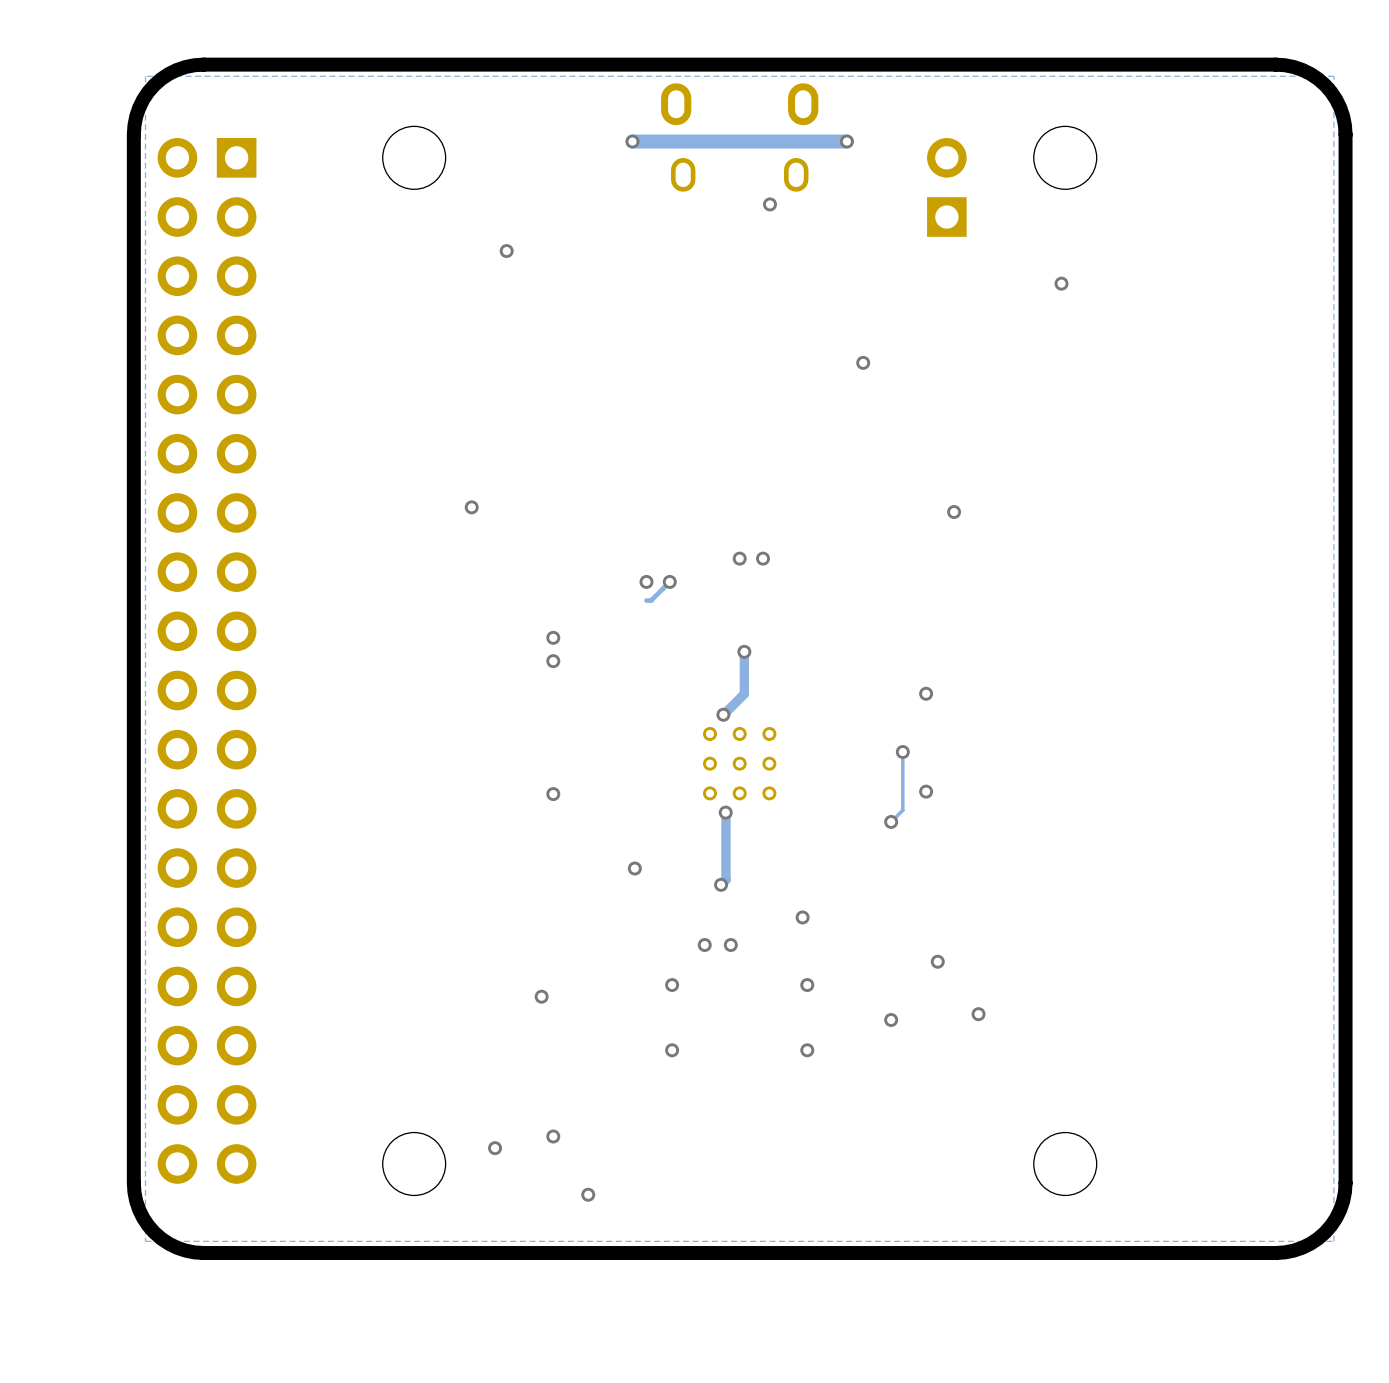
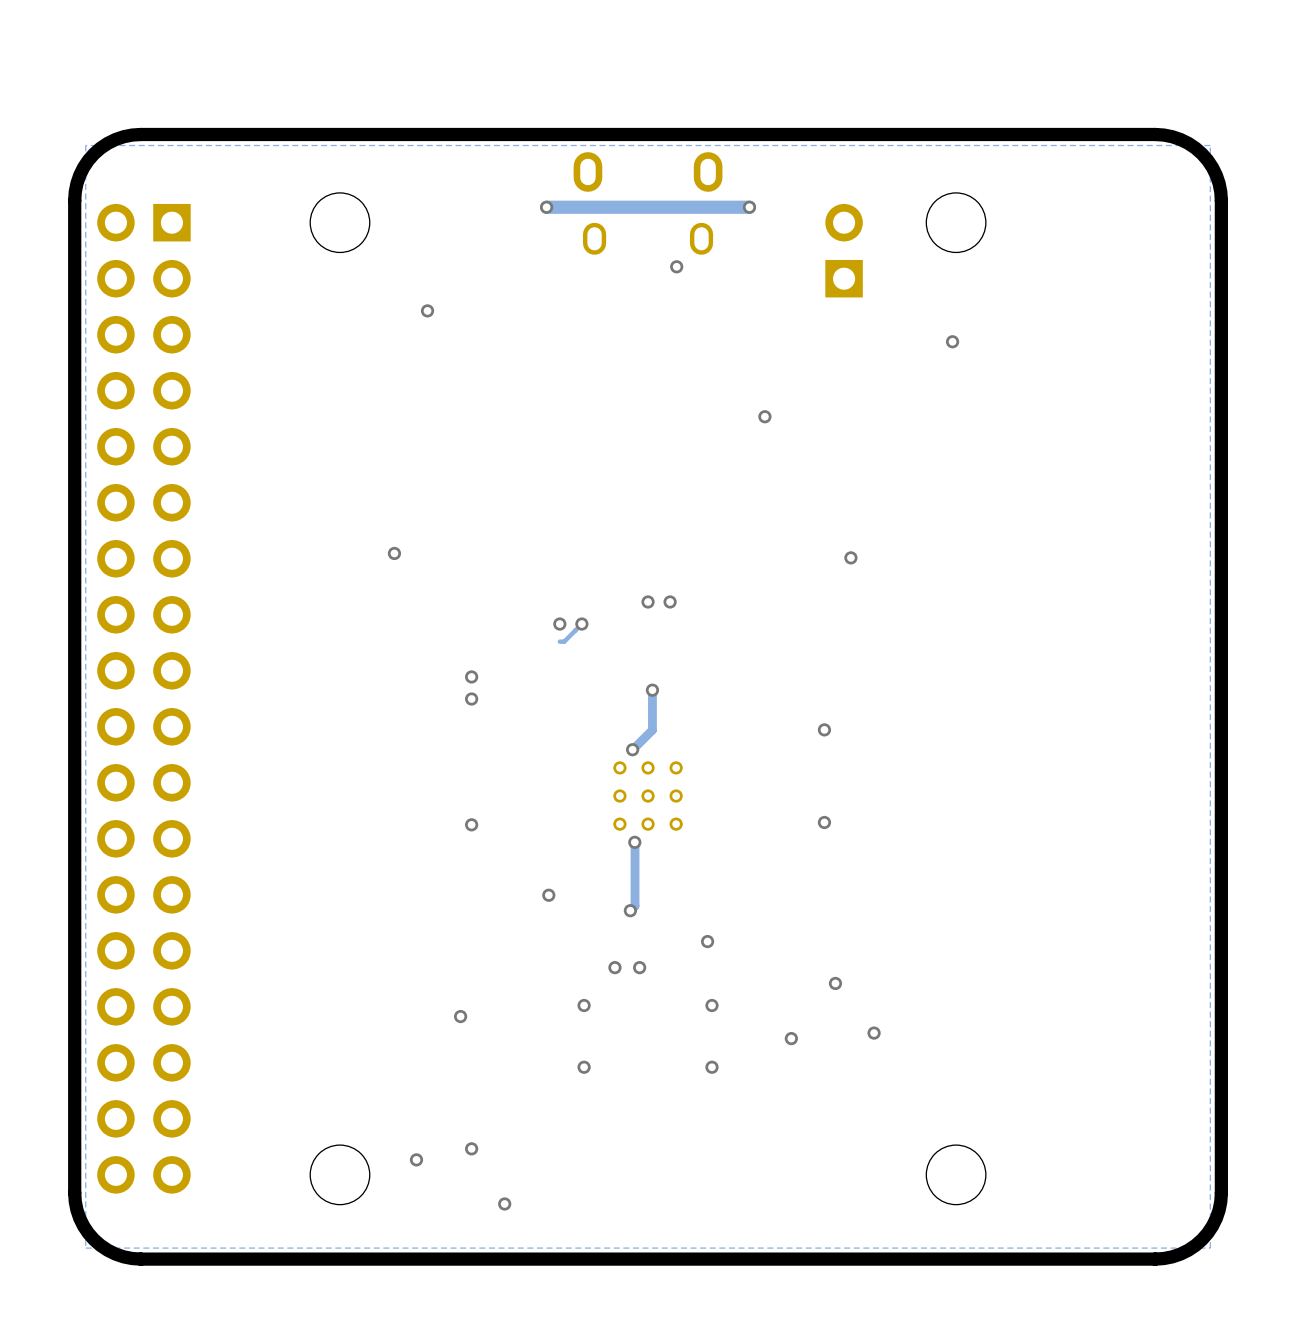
track: (902, 752) (902, 810) (891, 821) -> none
via: (902, 752) -> none
via: (891, 821) -> none

